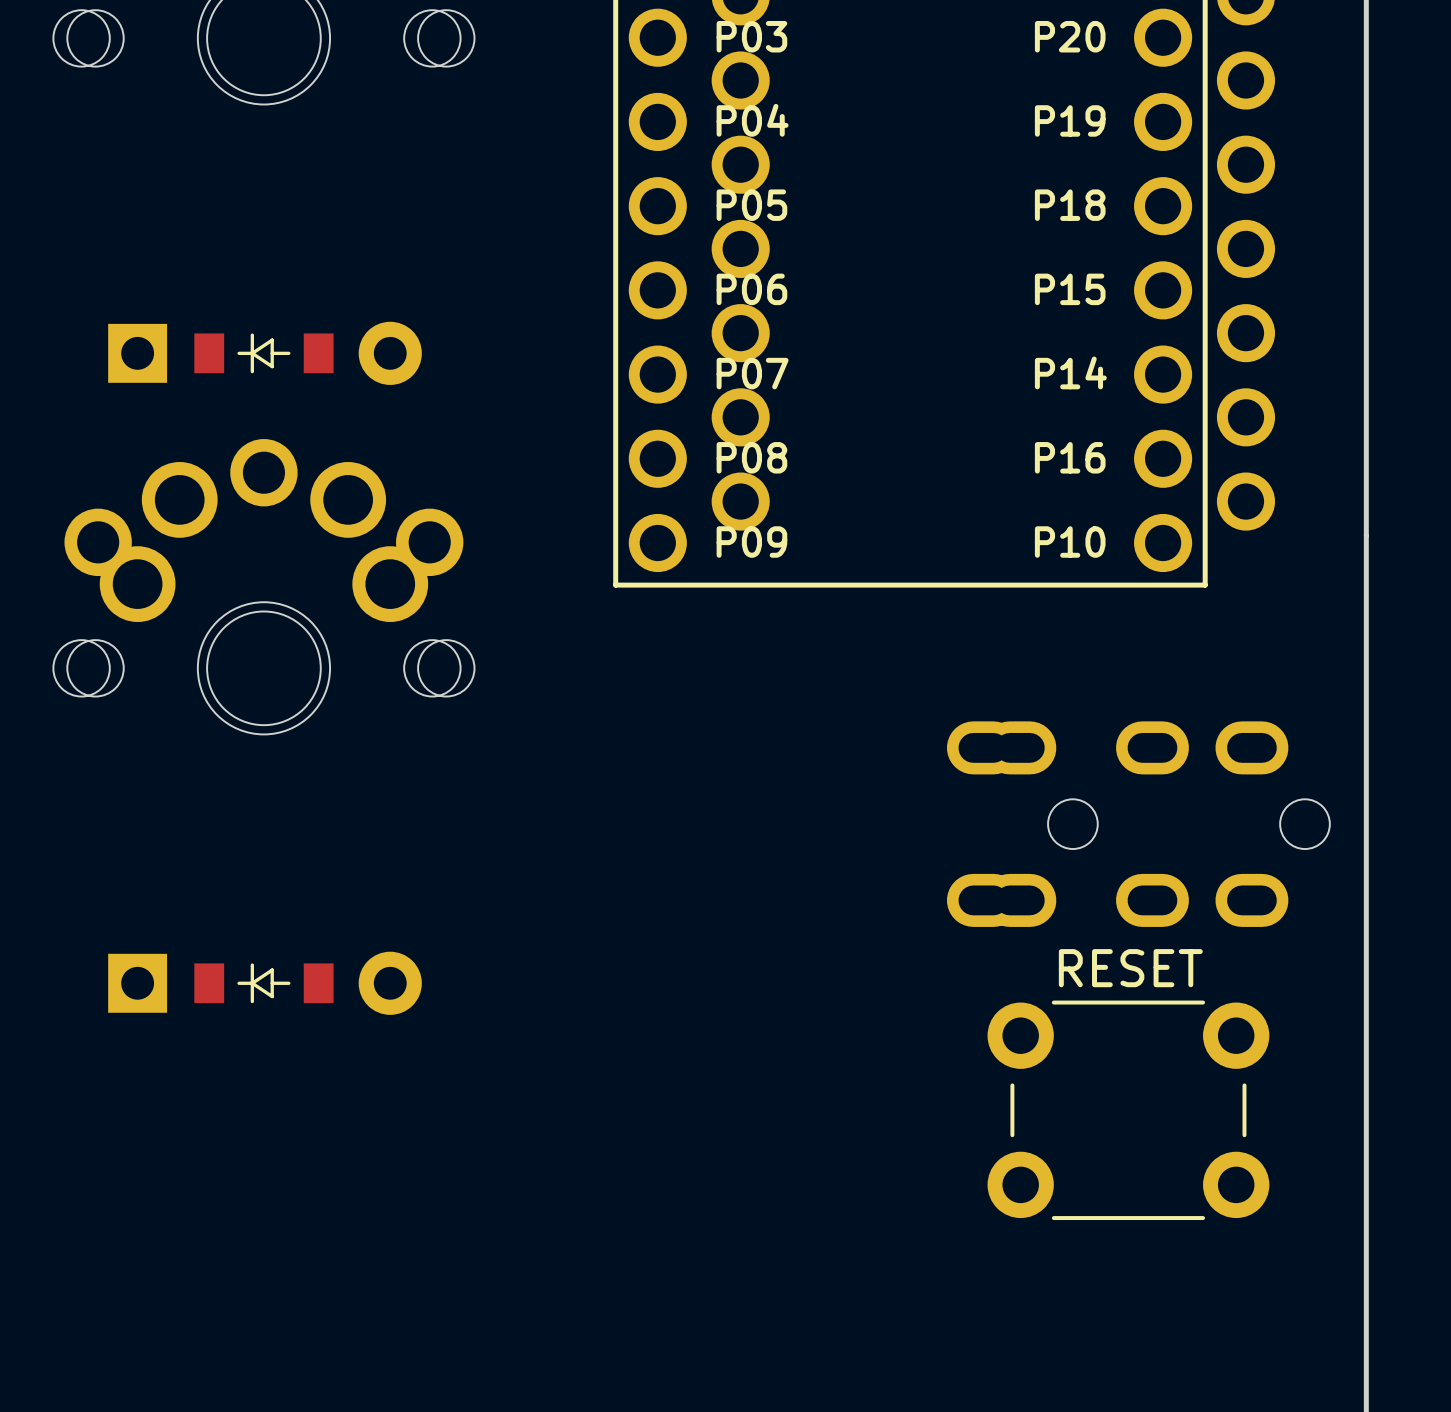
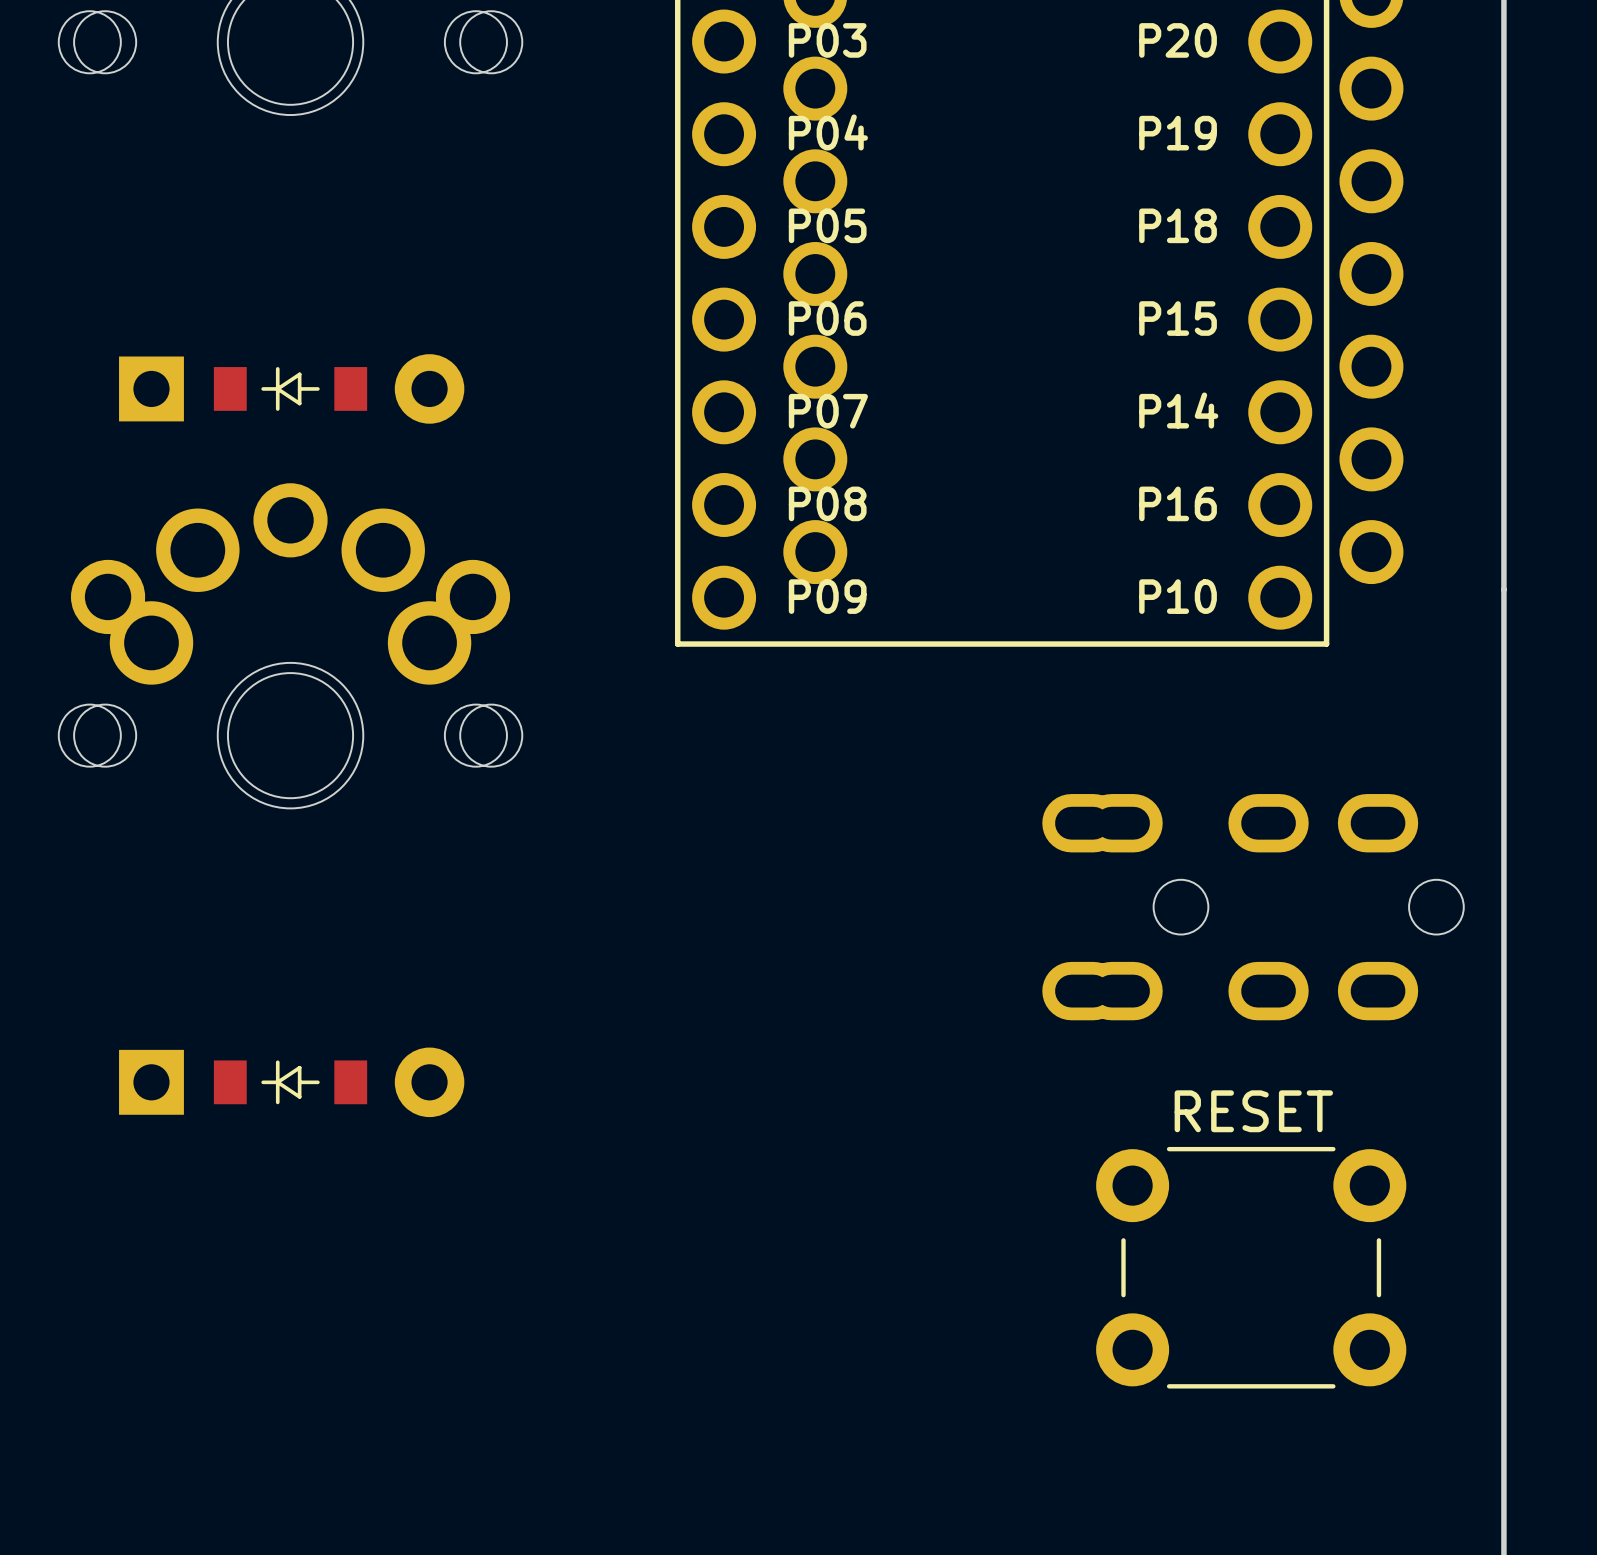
RESET position: (1128, 1110) -> (1251, 1267)

